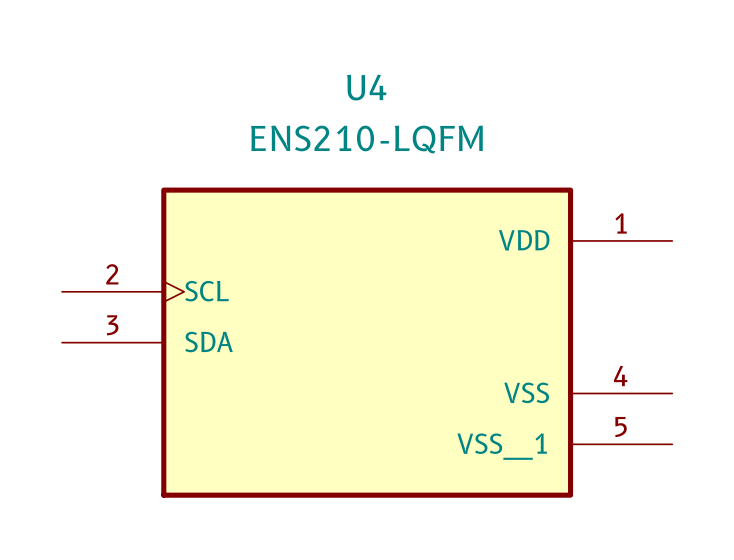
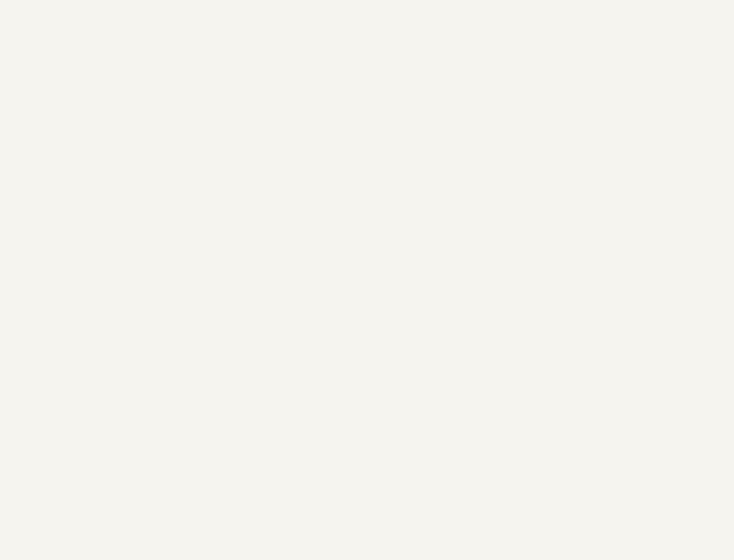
U4: ENS210-LQFM (367, 342) -> none

